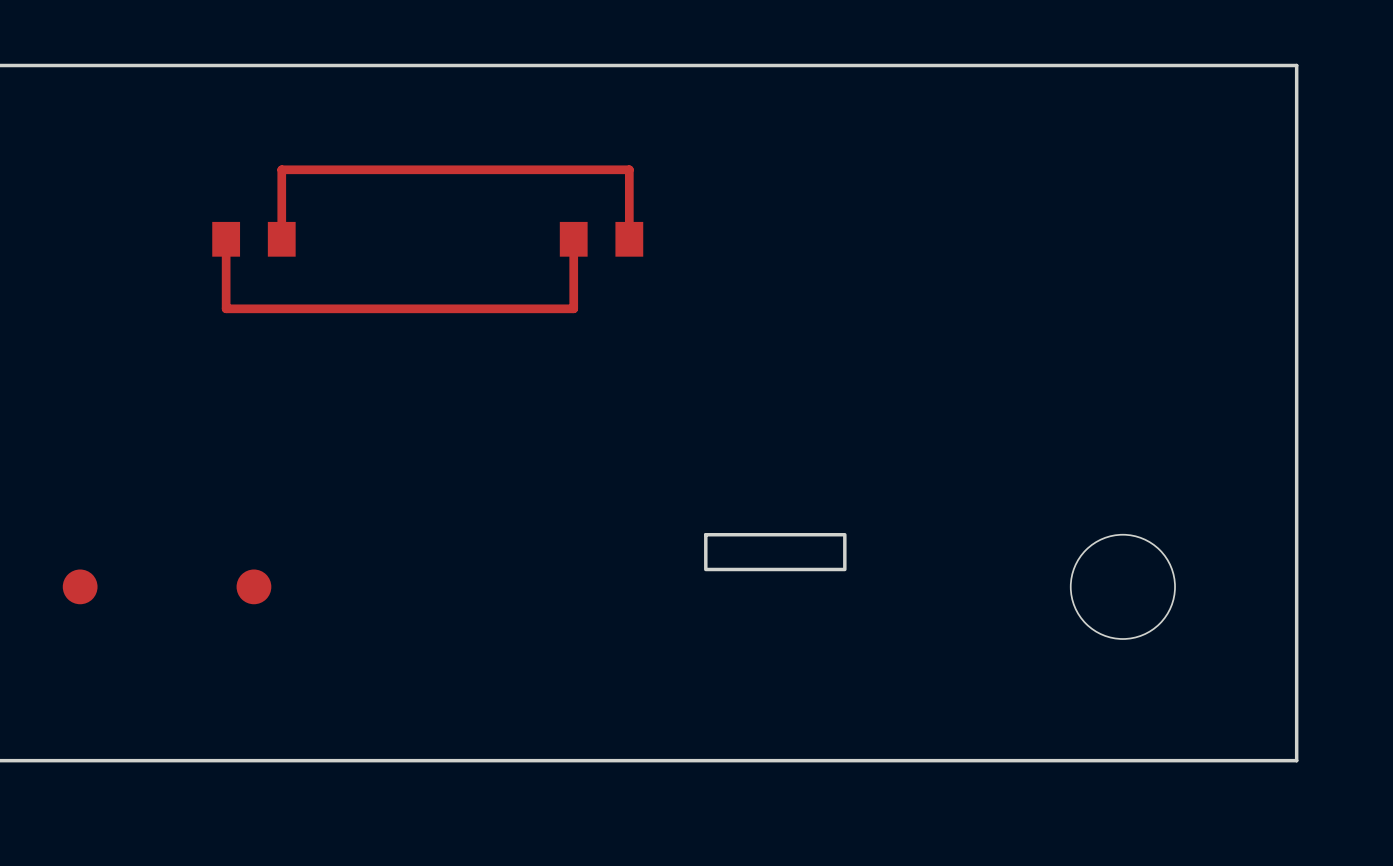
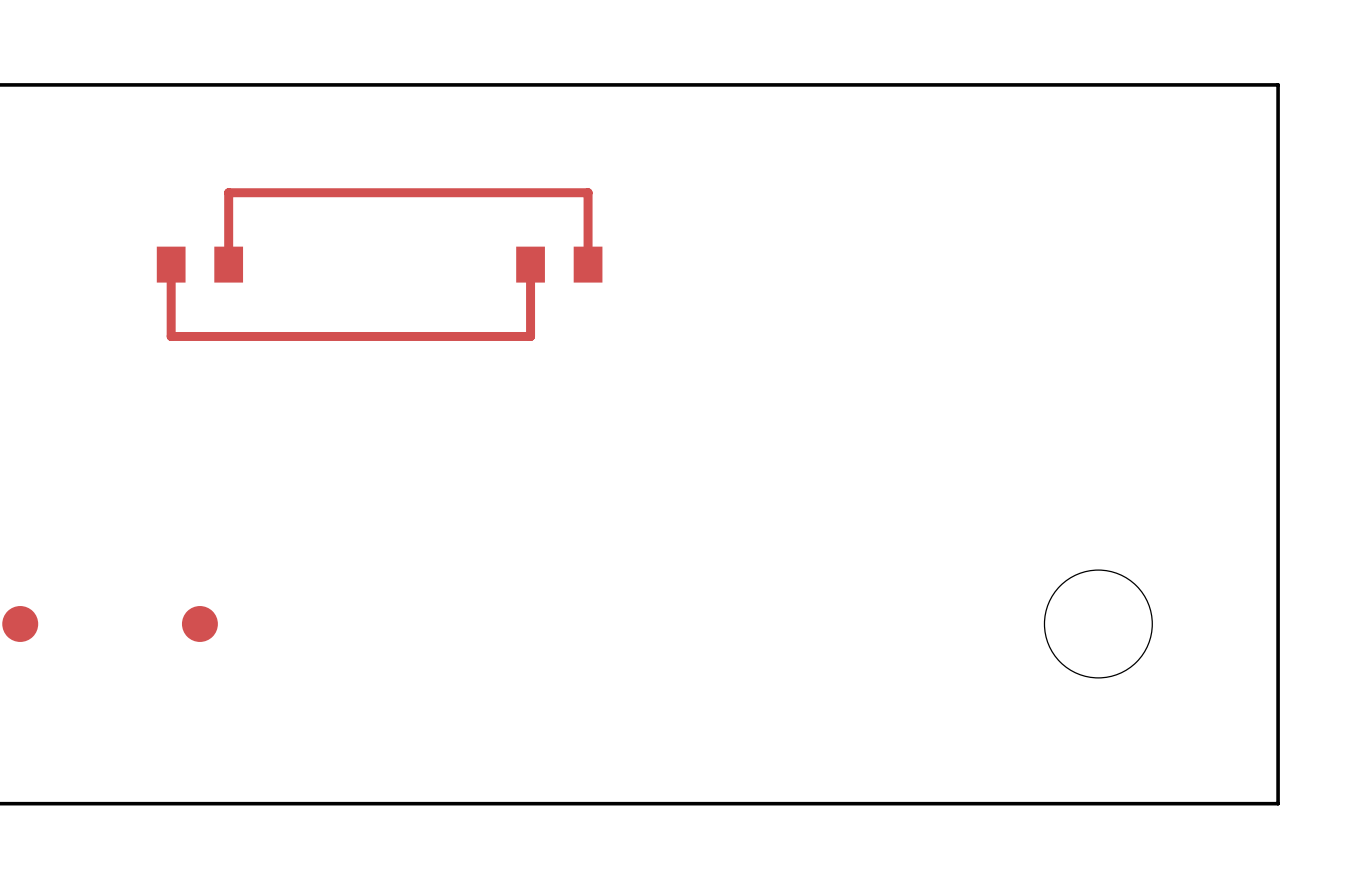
drawing: [704, 533, 847, 572] -> none

